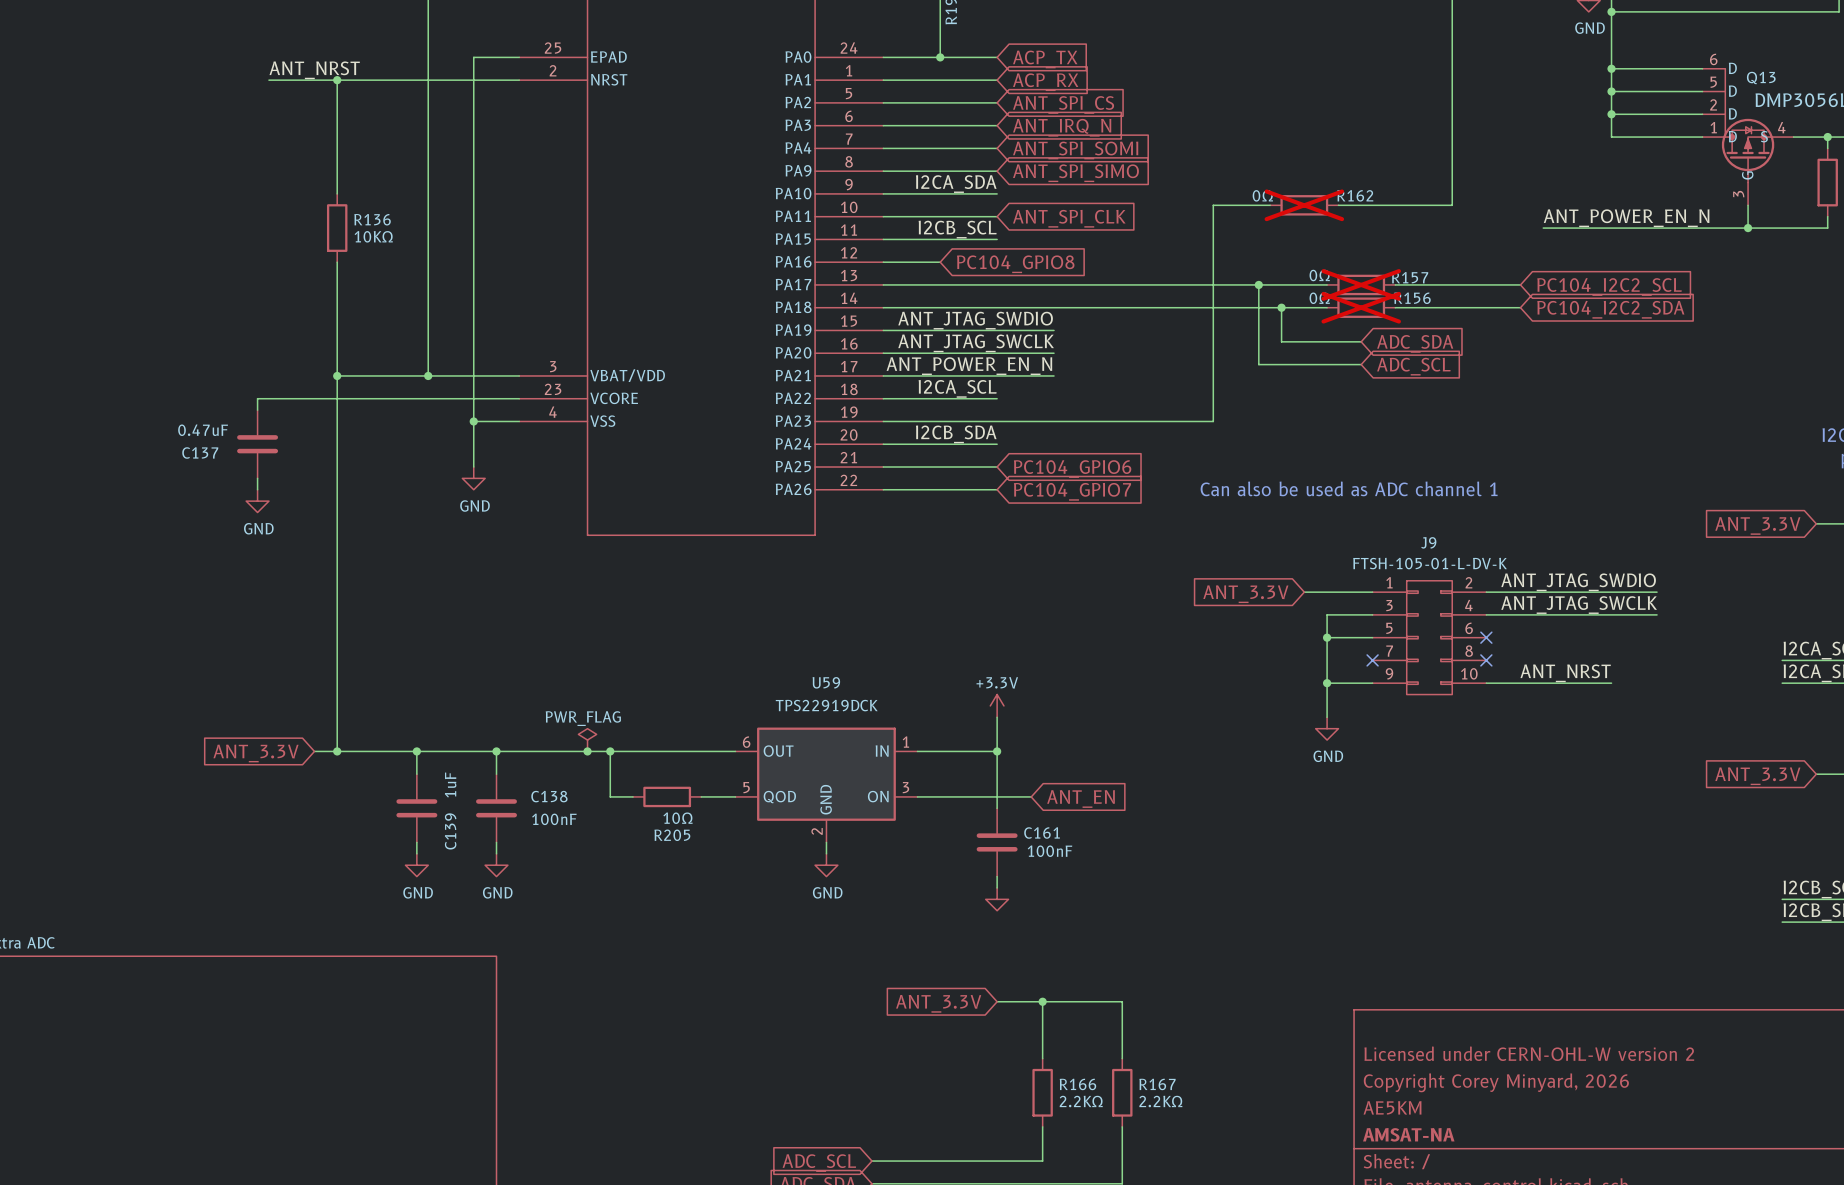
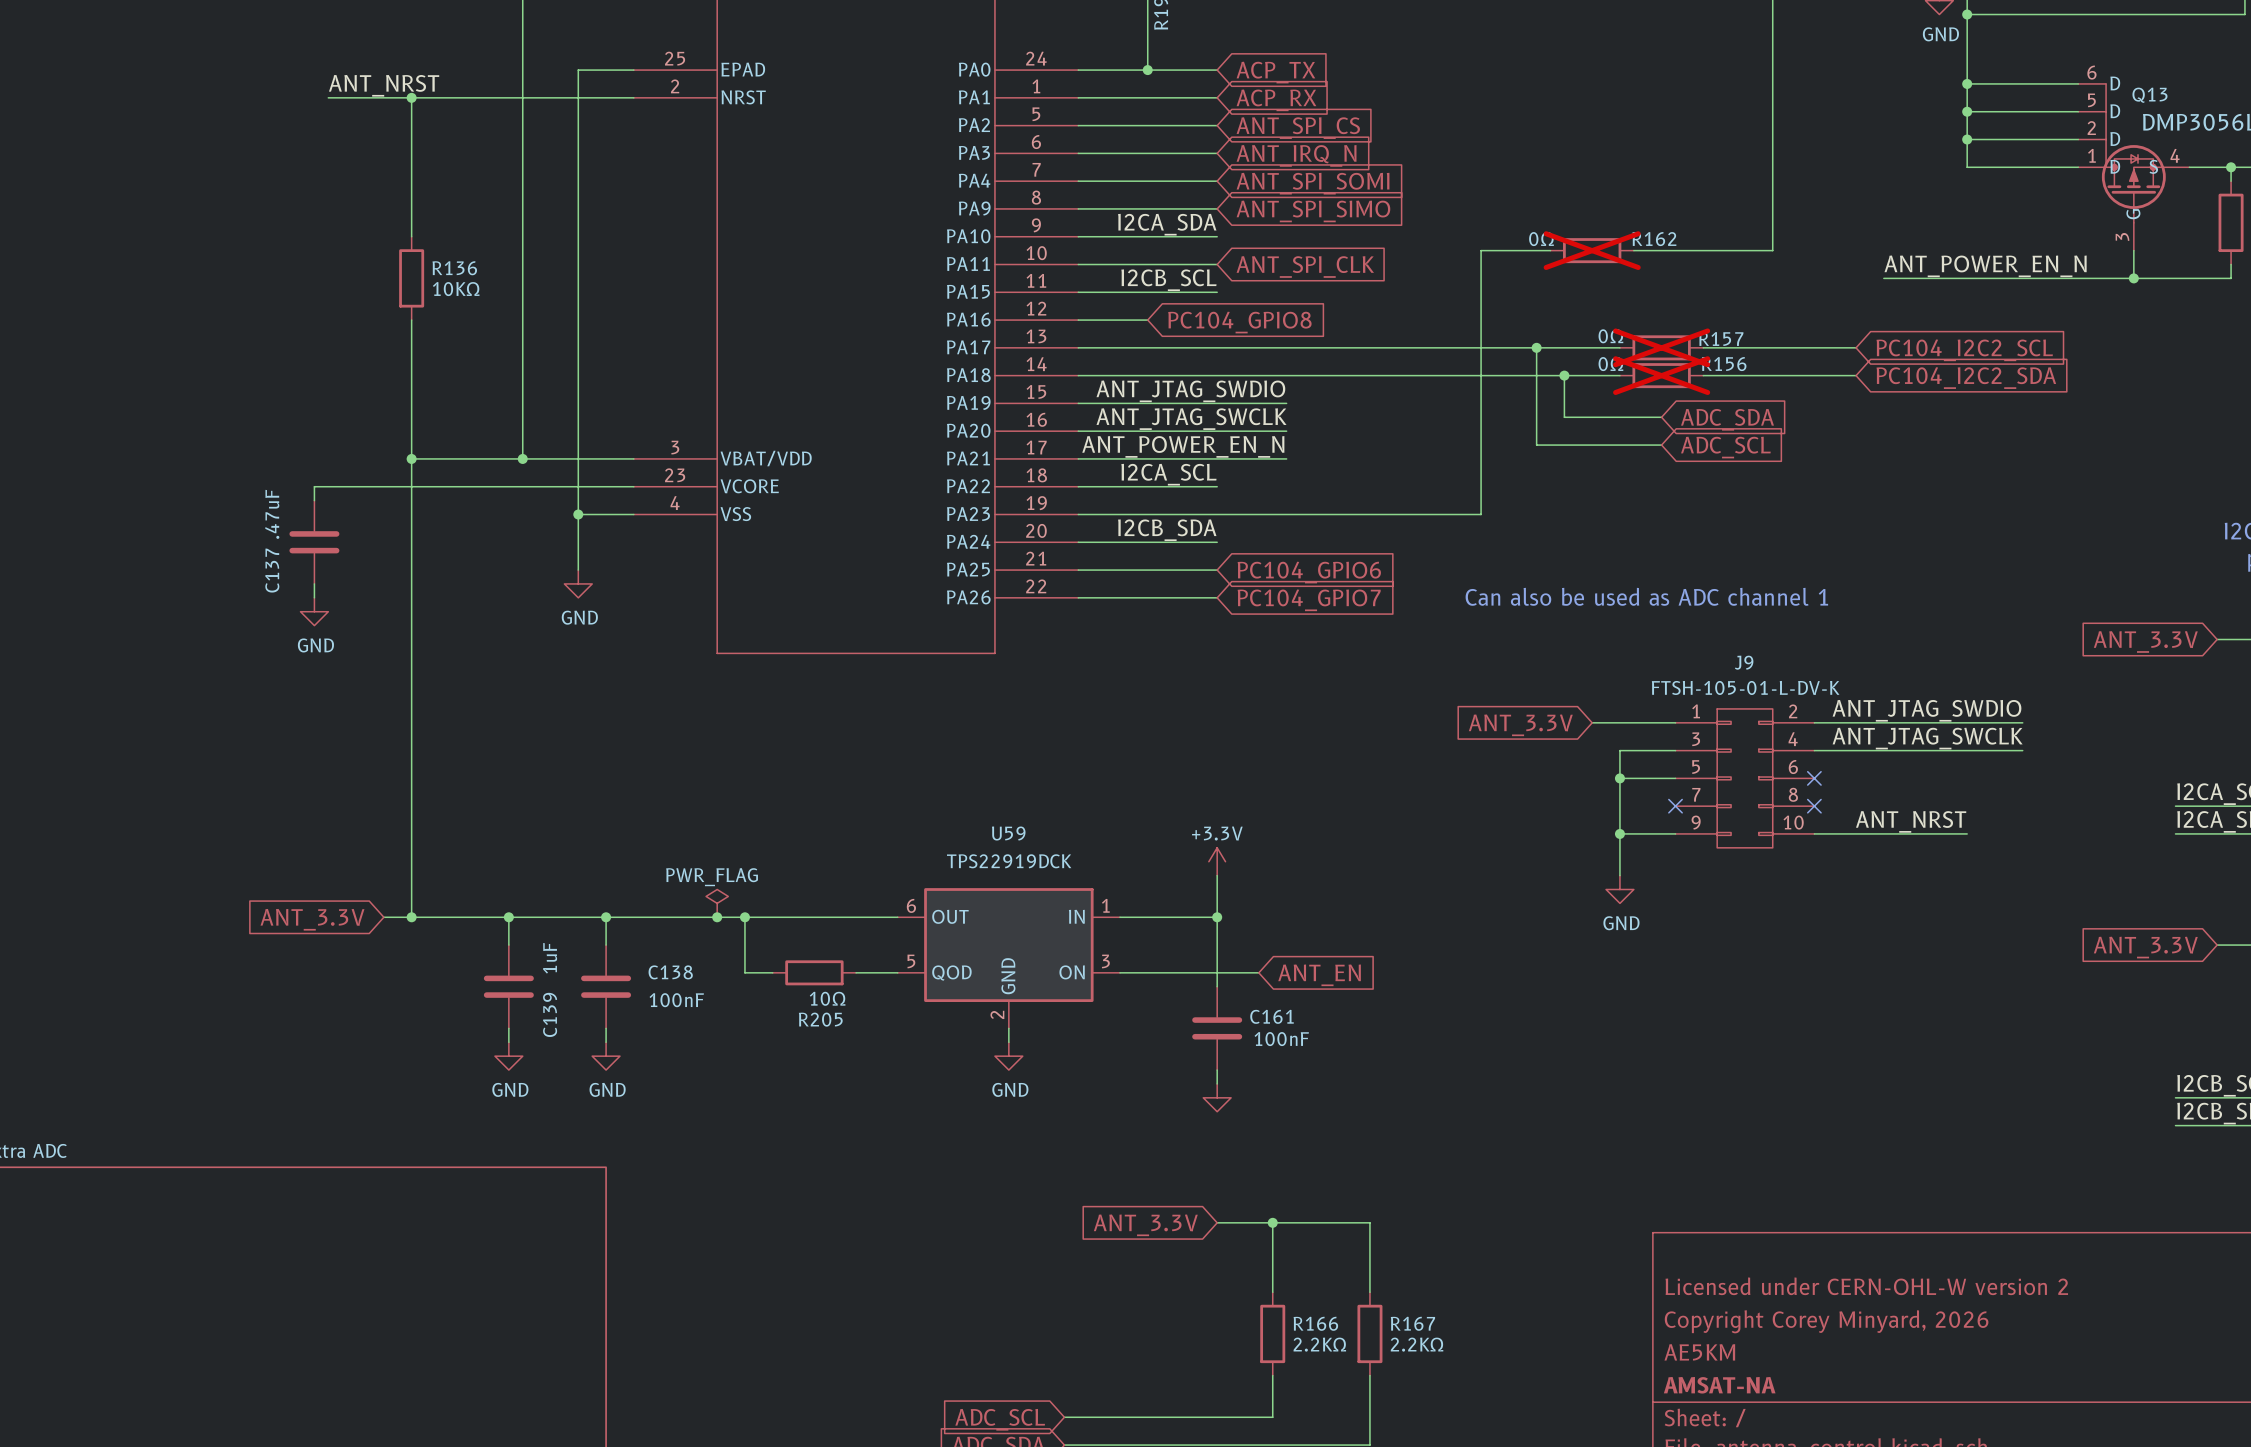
C137 value: 0.47uF (203, 430) -> .47uF (272, 514)
C137 name rotation: 0° (200, 452) -> 90° counterclockwise (272, 570)

